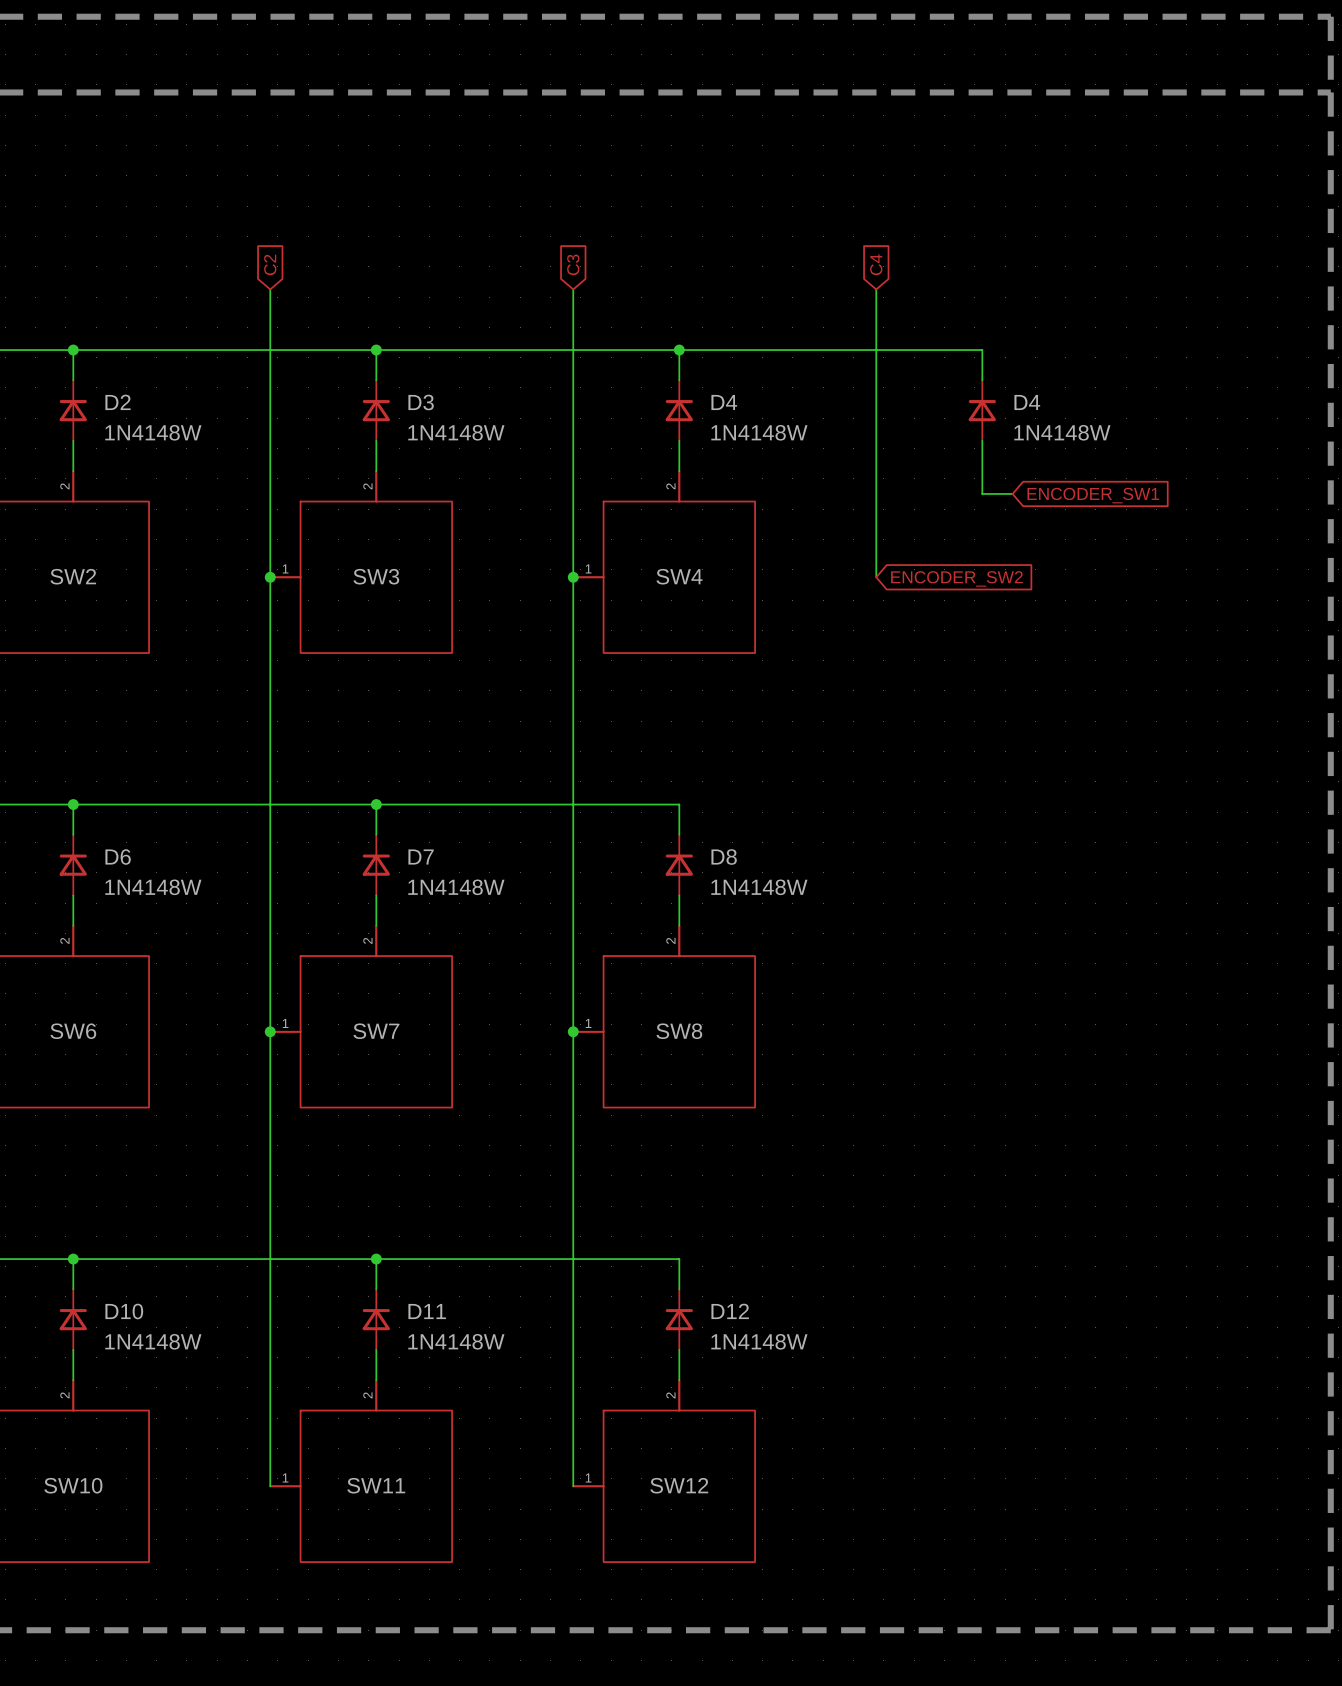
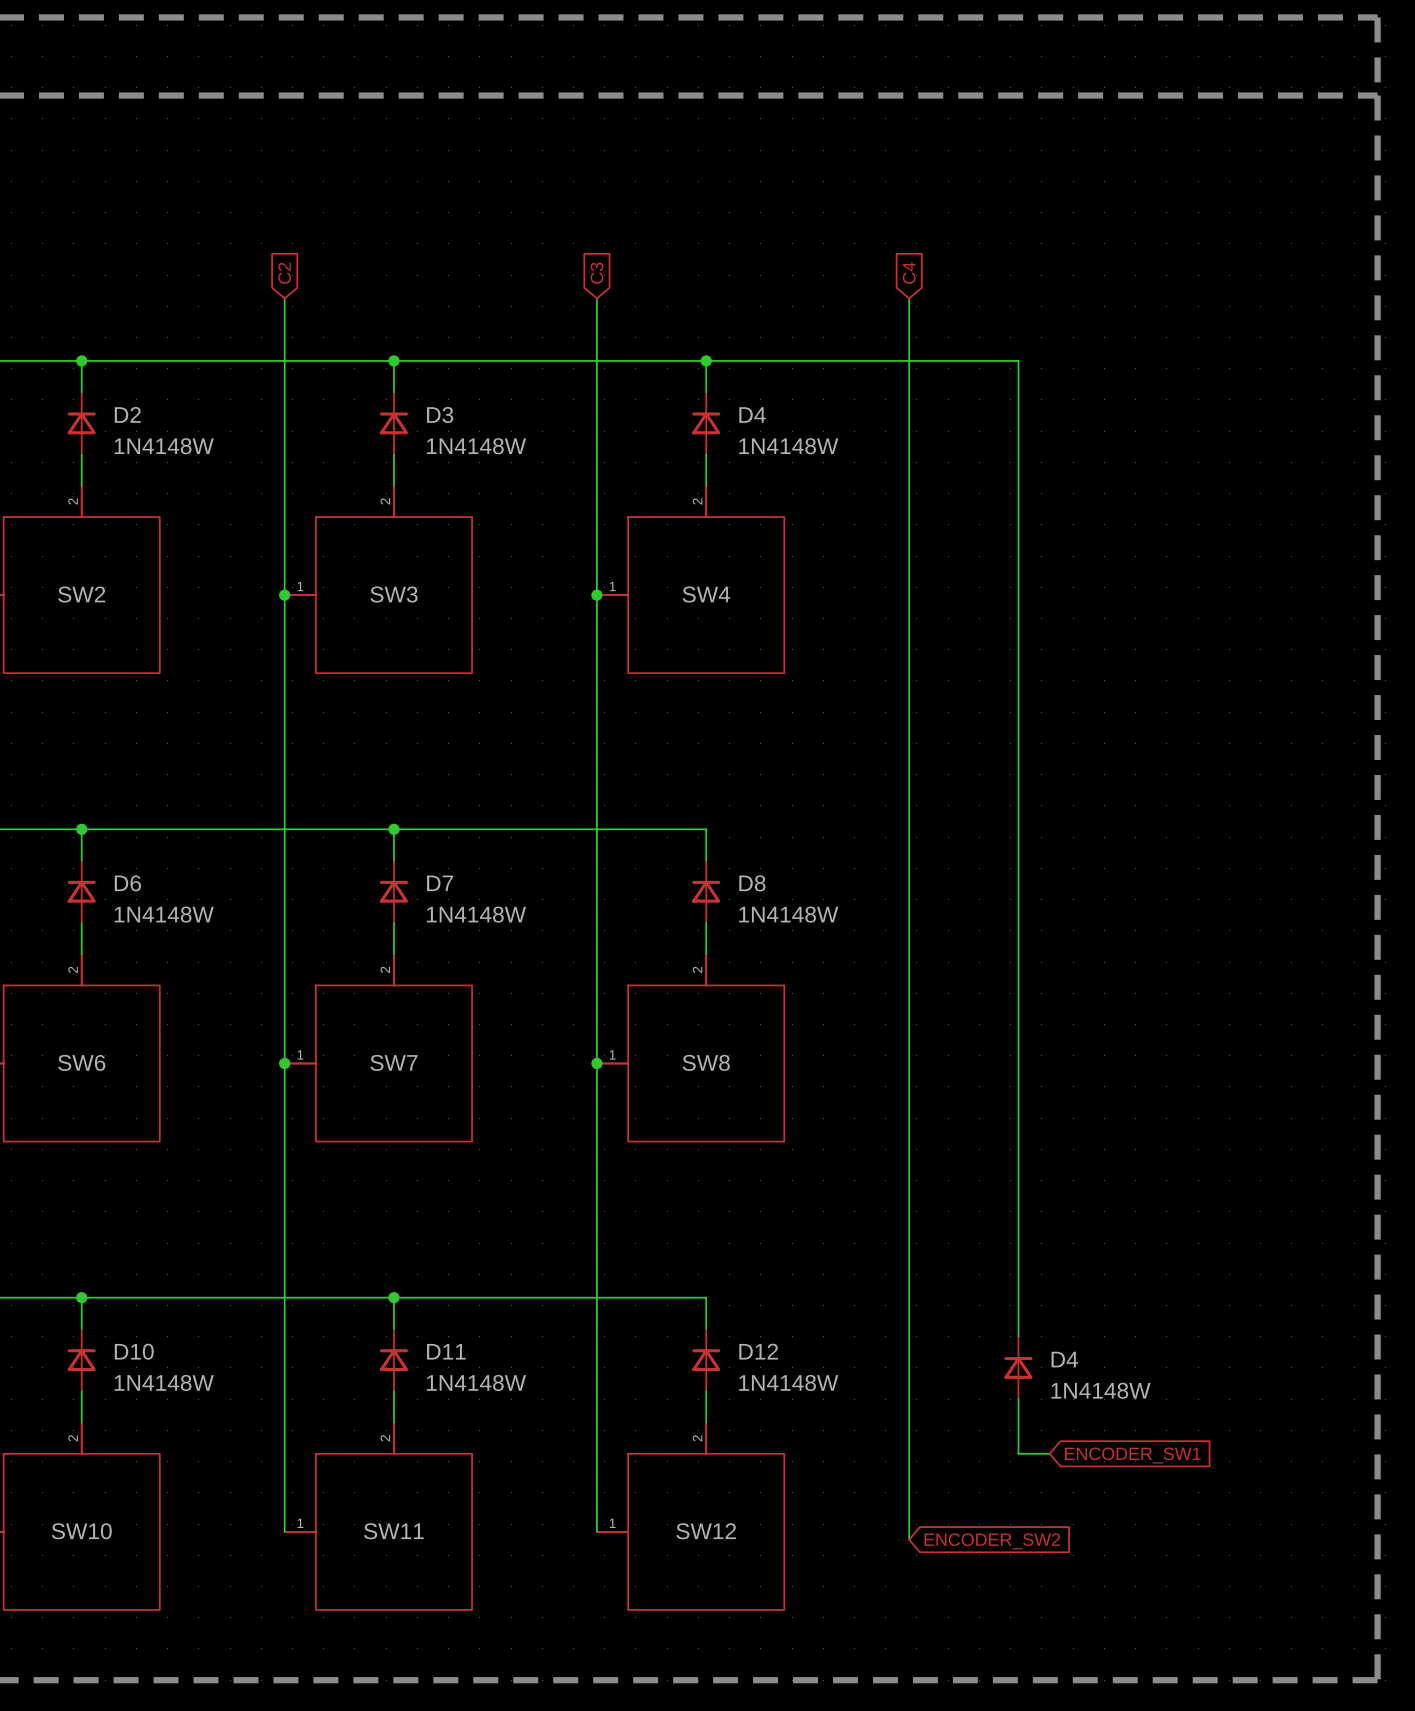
D4: 1N4148W (982, 410) -> none
wire: (982, 493) (1012, 493) -> (1018, 509) (1018, 1336)
global label: ENCODER_SW1 (1093, 495) -> none
wire: none -> (909, 595) (909, 1539)
global label: ENCODER_SW2 (956, 578) -> none
D4: none -> 1N4148W (1018, 1367)
wire: none -> (1018, 1399) (1018, 1453) (1049, 1453)
global label: none -> ENCODER_SW1 (1132, 1455)
global label: none -> ENCODER_SW2 (992, 1541)

